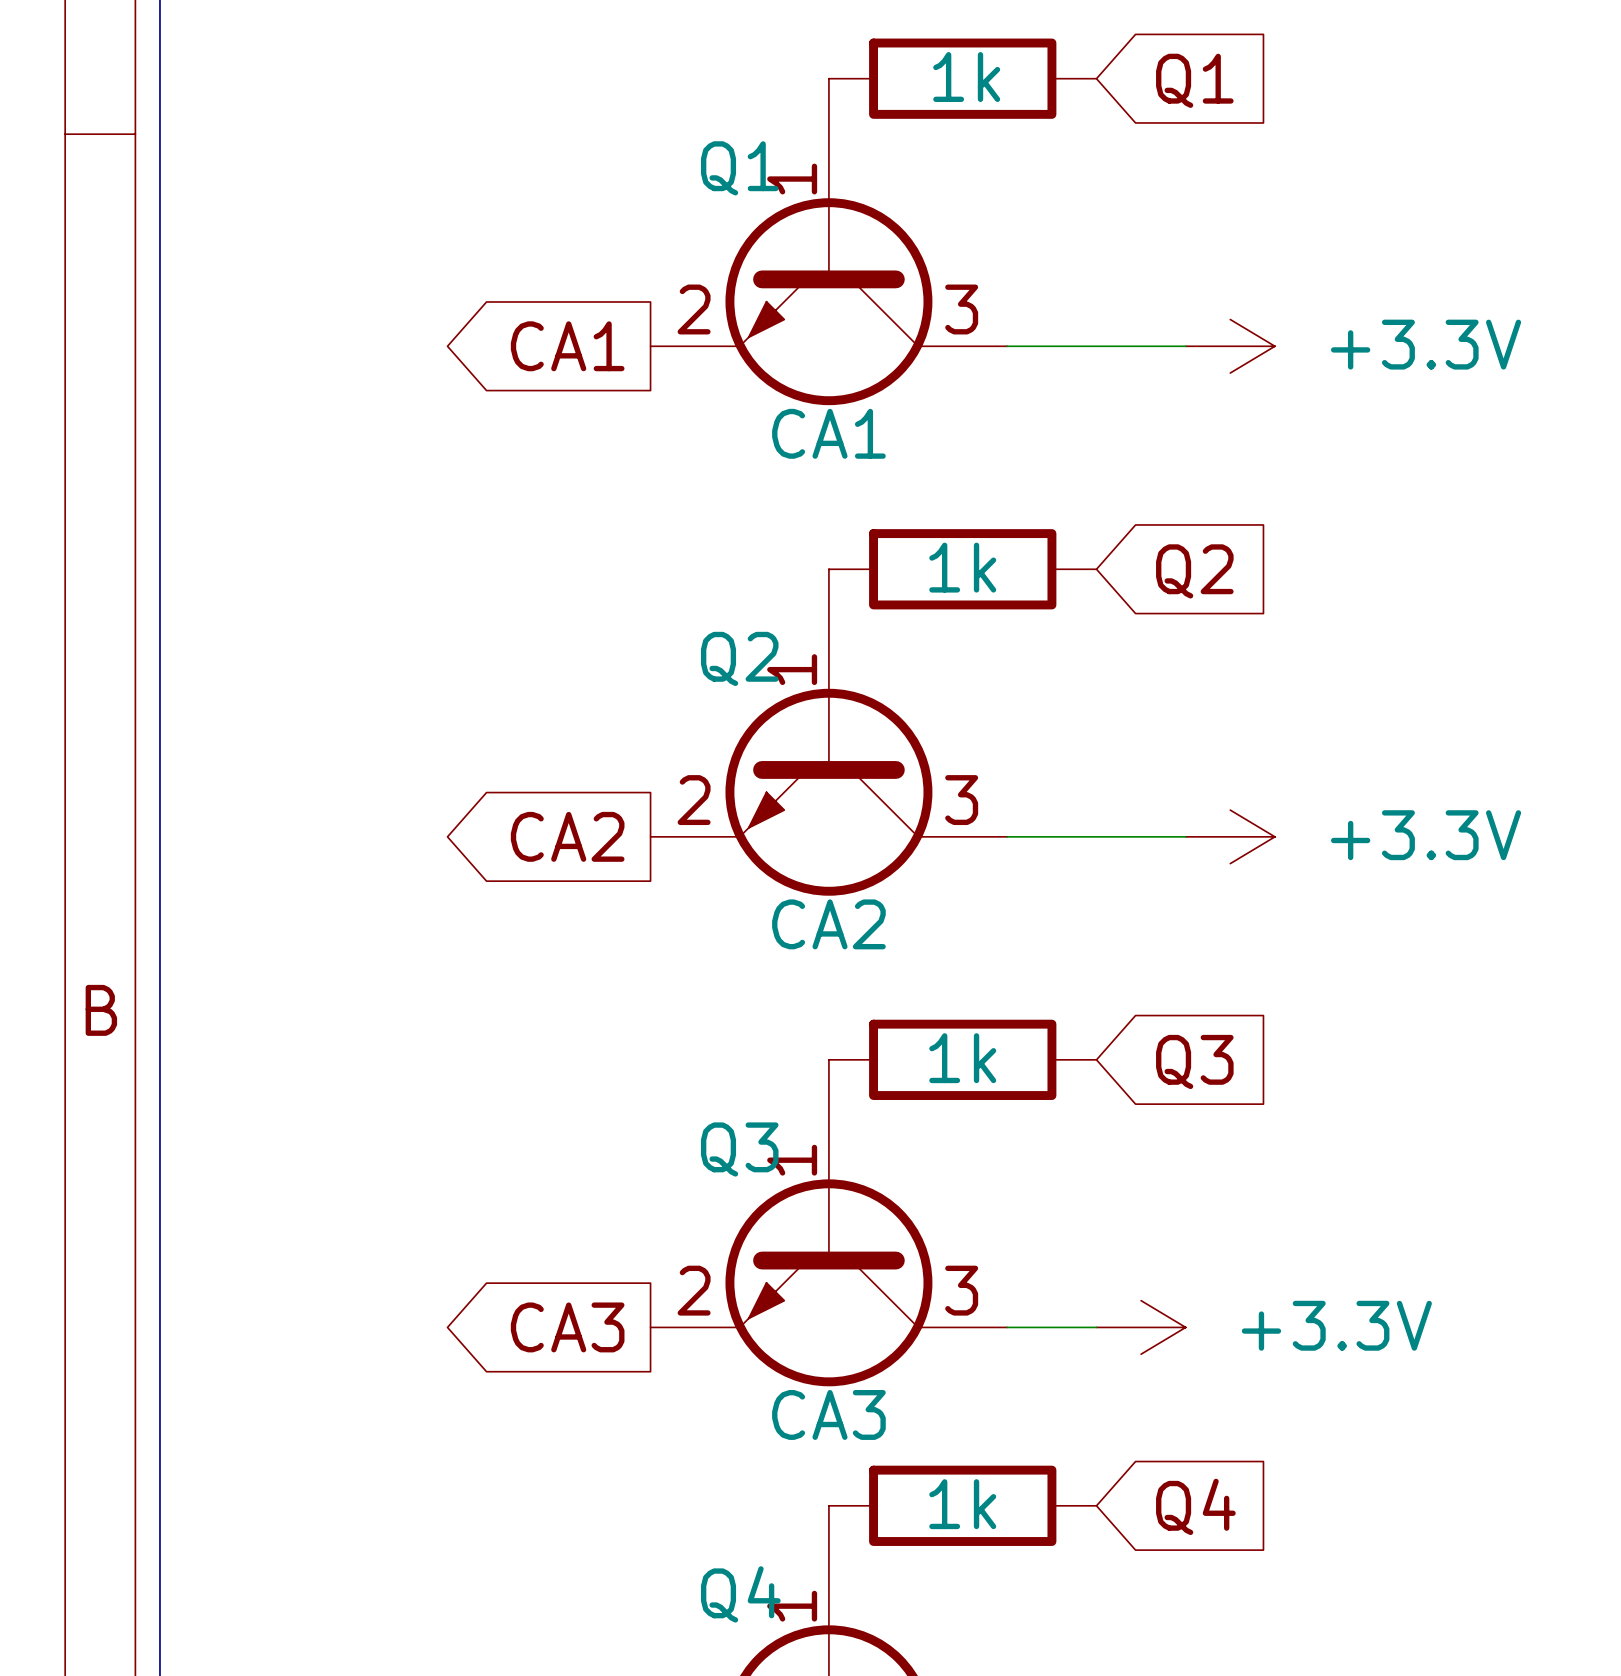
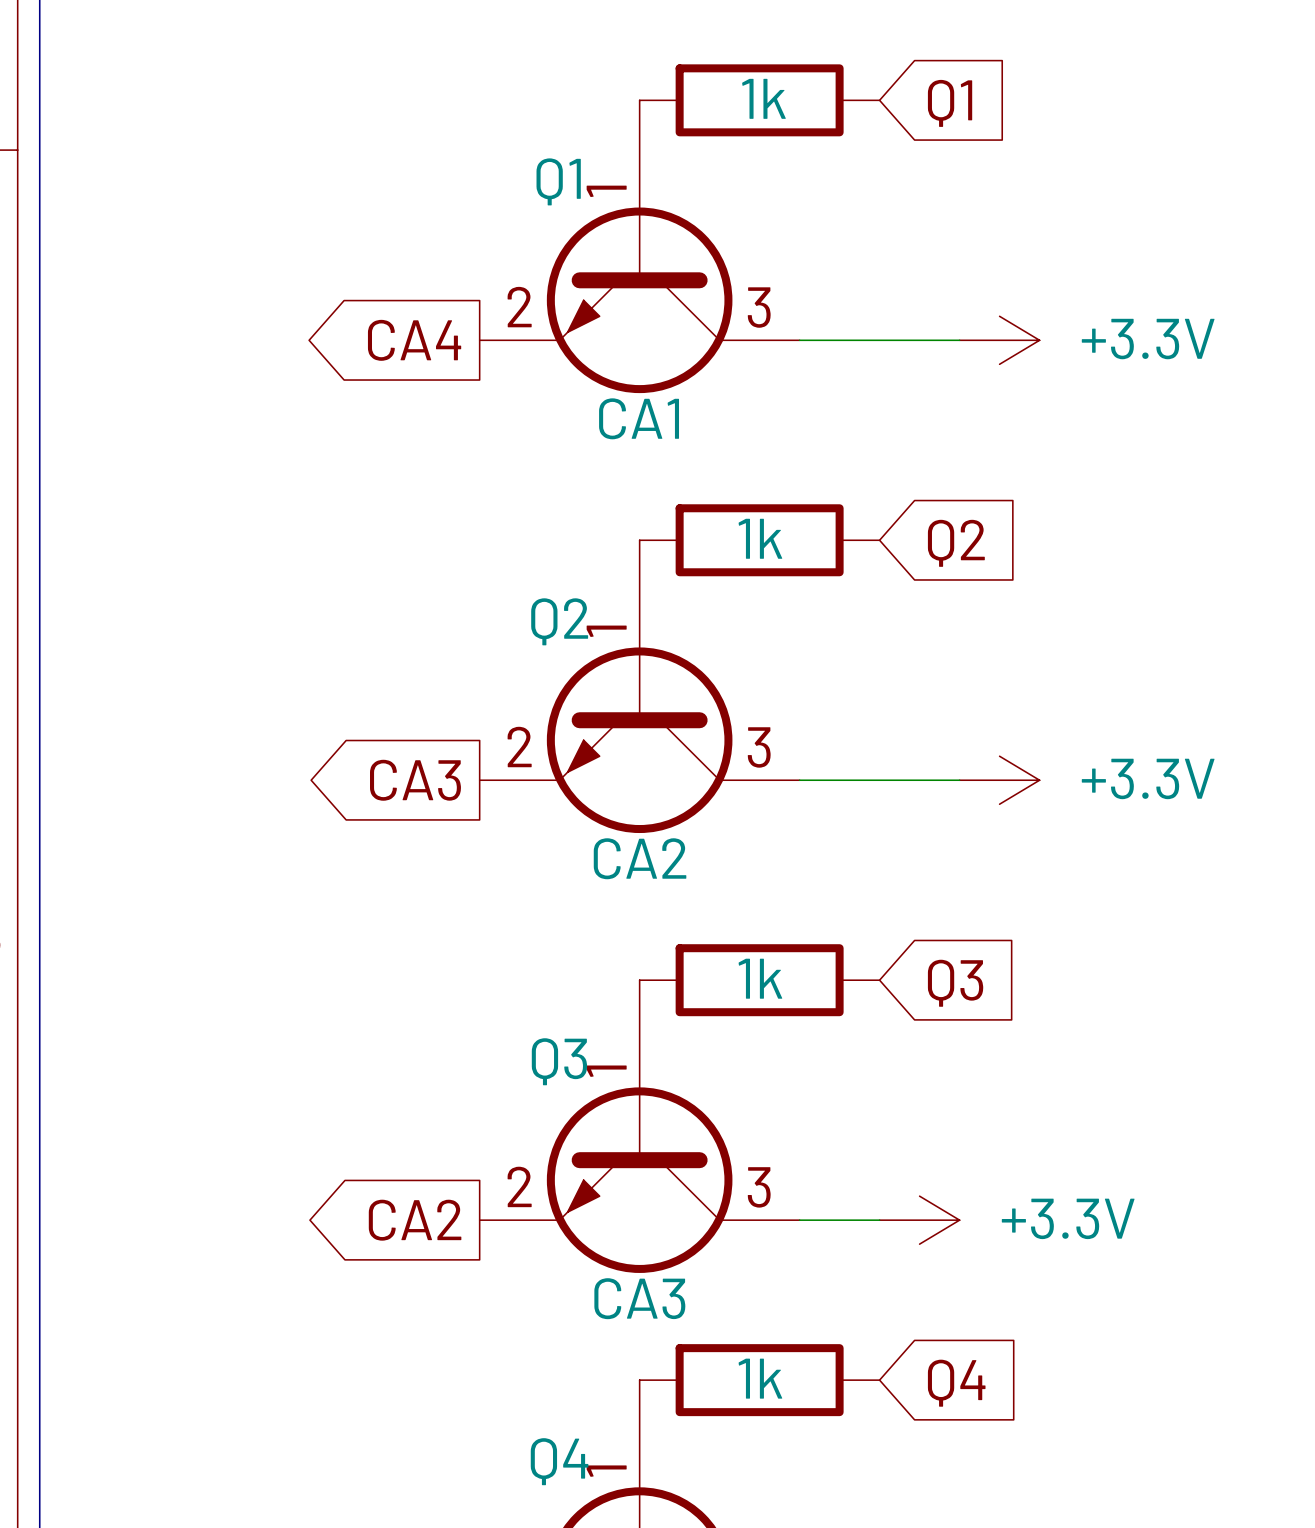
global label: CA1 (567, 346) -> CA4 (414, 340)
global label: CA2 (567, 836) -> CA3 (415, 780)
global label: CA3 (567, 1327) -> CA2 (415, 1220)

